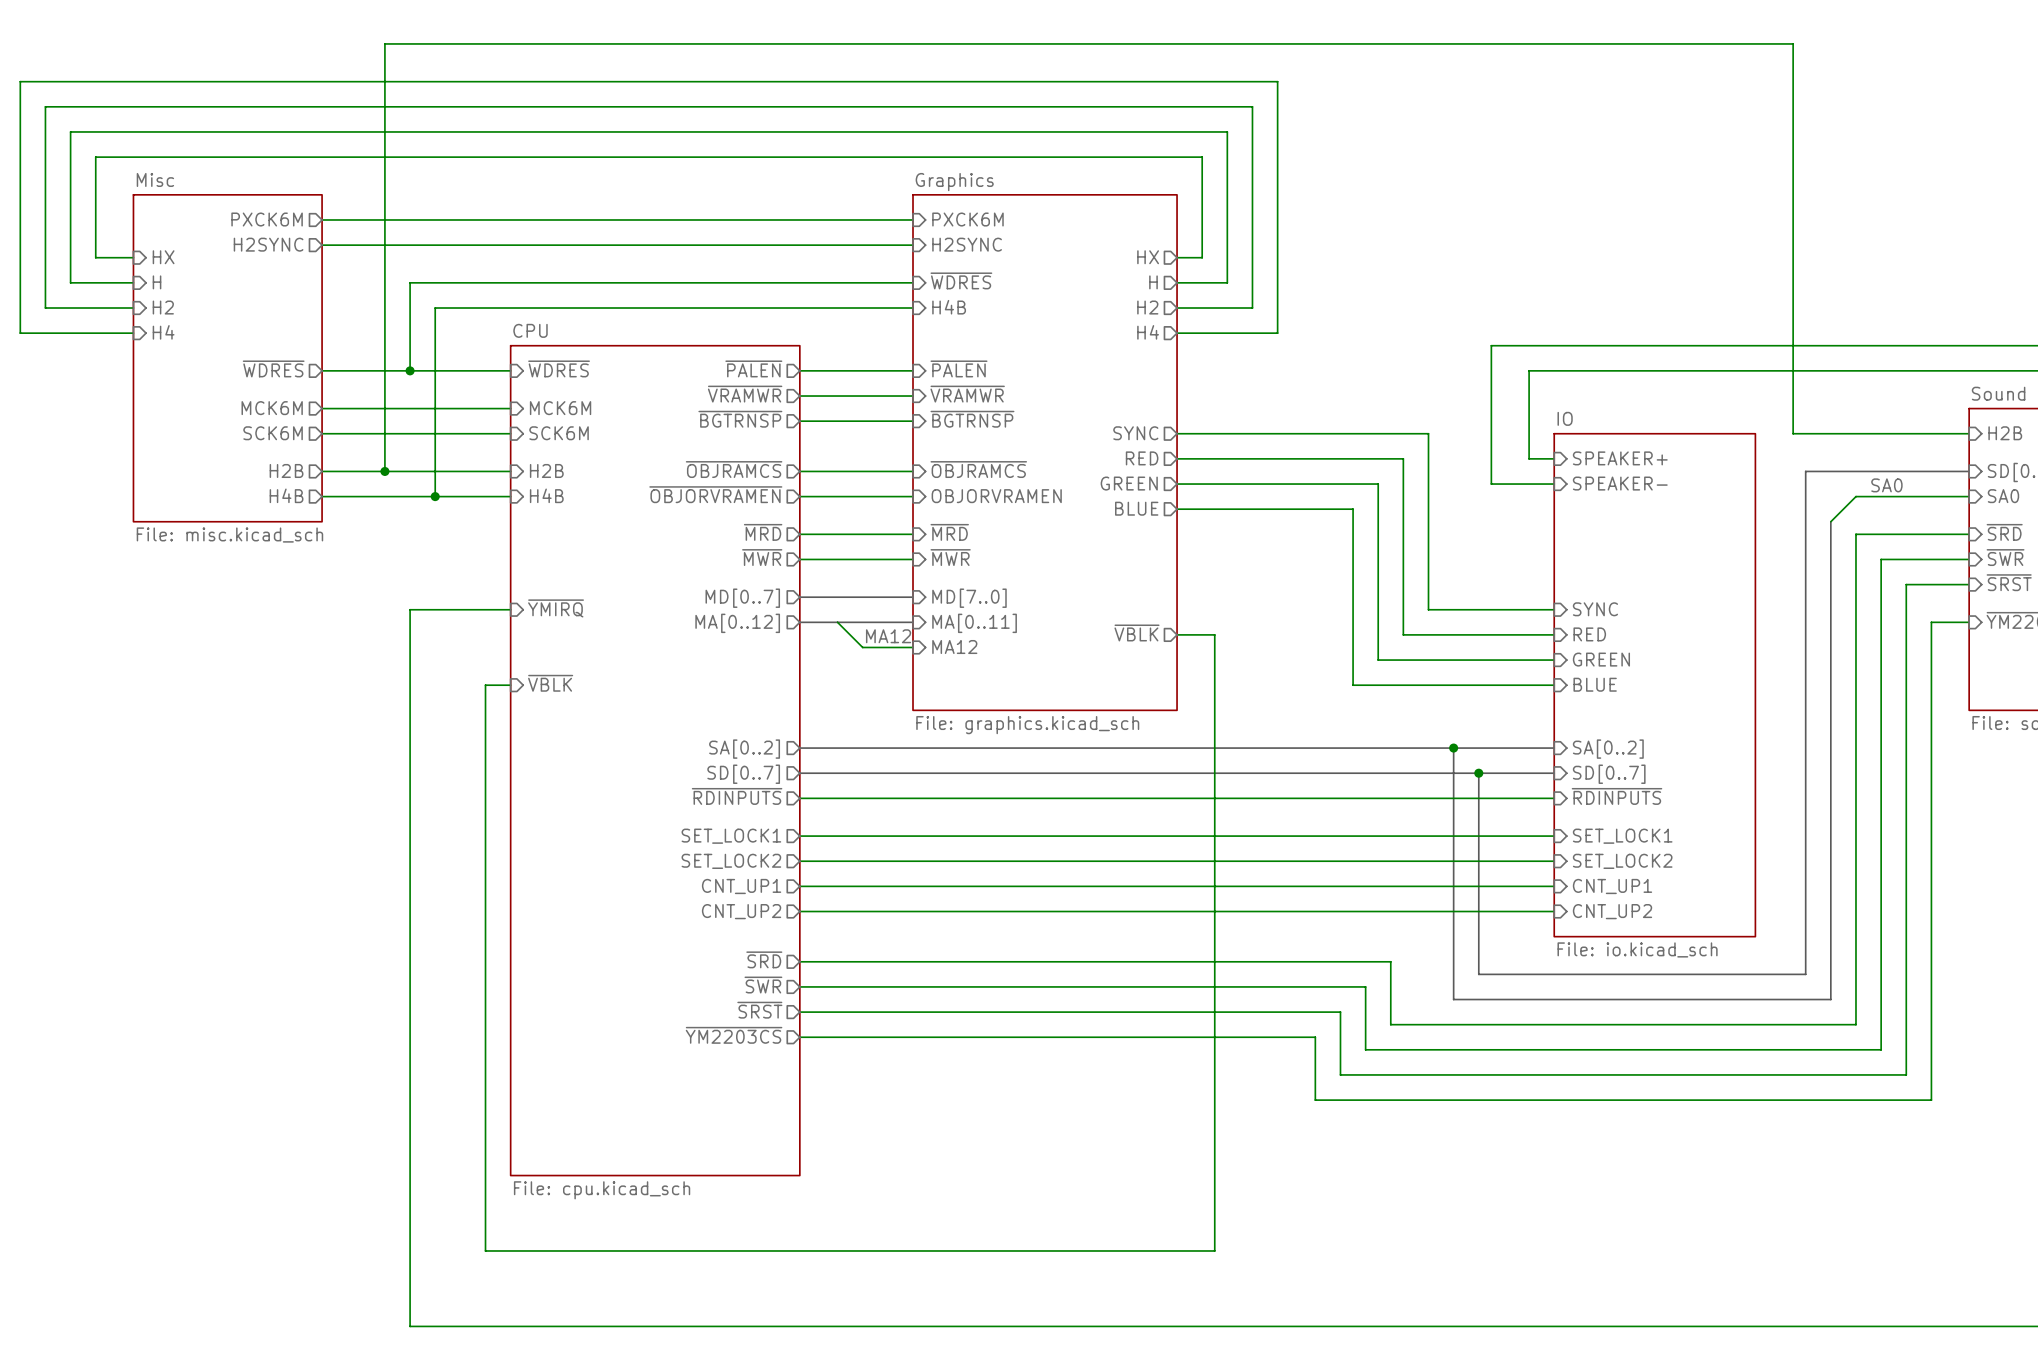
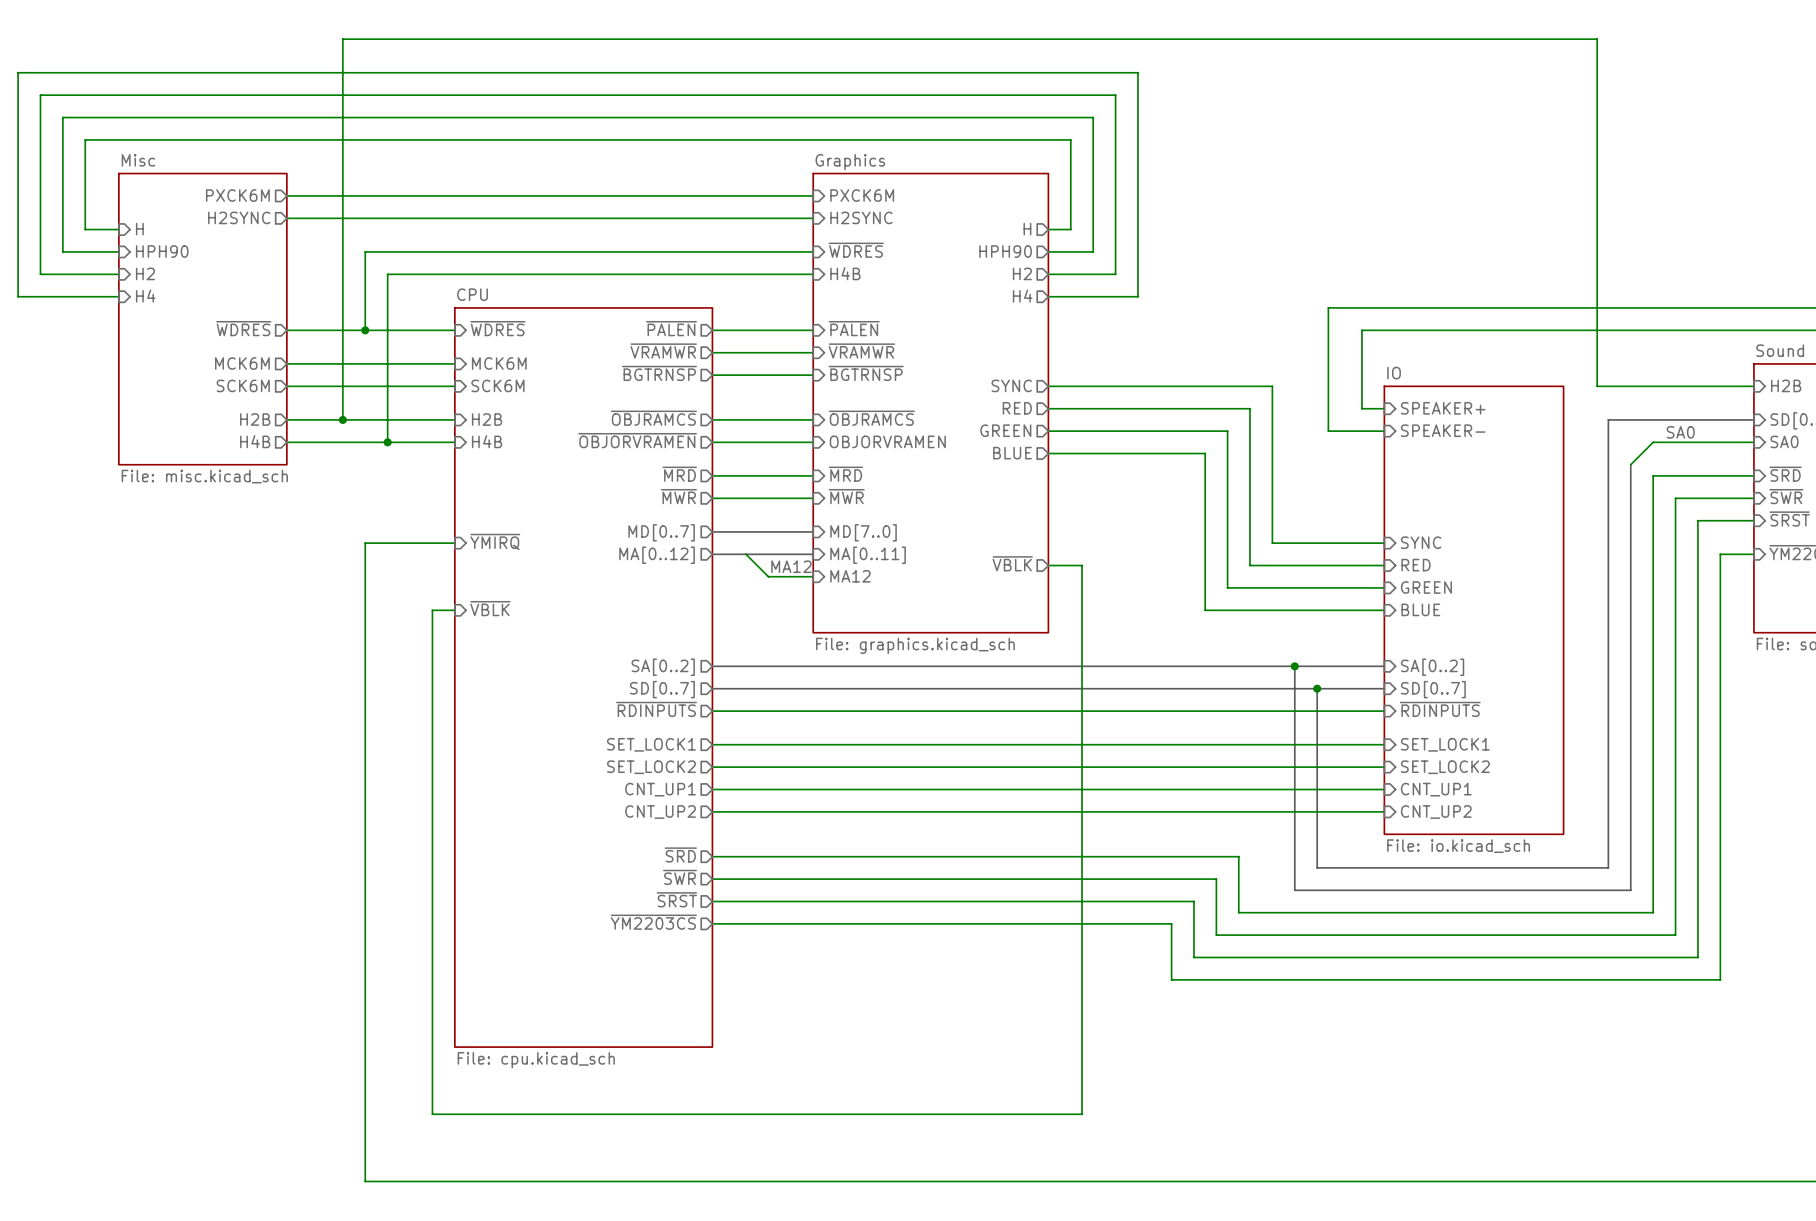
sheet pin: HX (163, 257) -> H (139, 229)
sheet pin: HX (1148, 257) -> H (1027, 229)
sheet pin: H (157, 282) -> HPH90 (162, 251)
sheet pin: H (1153, 282) -> HPH90 (1005, 251)

